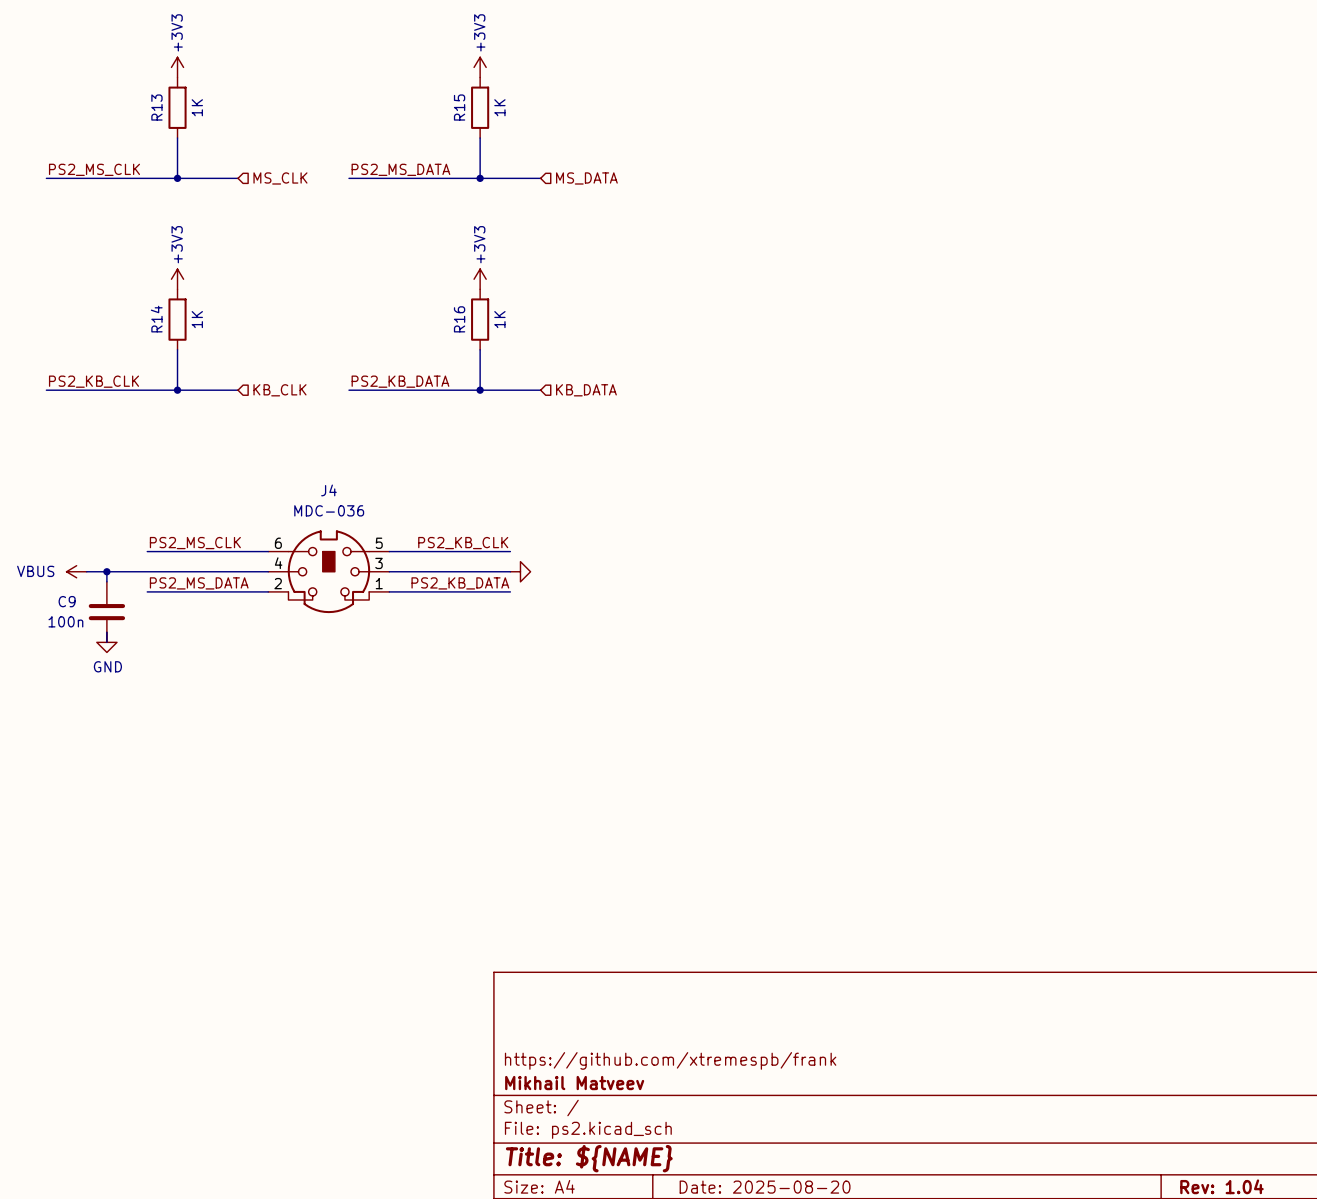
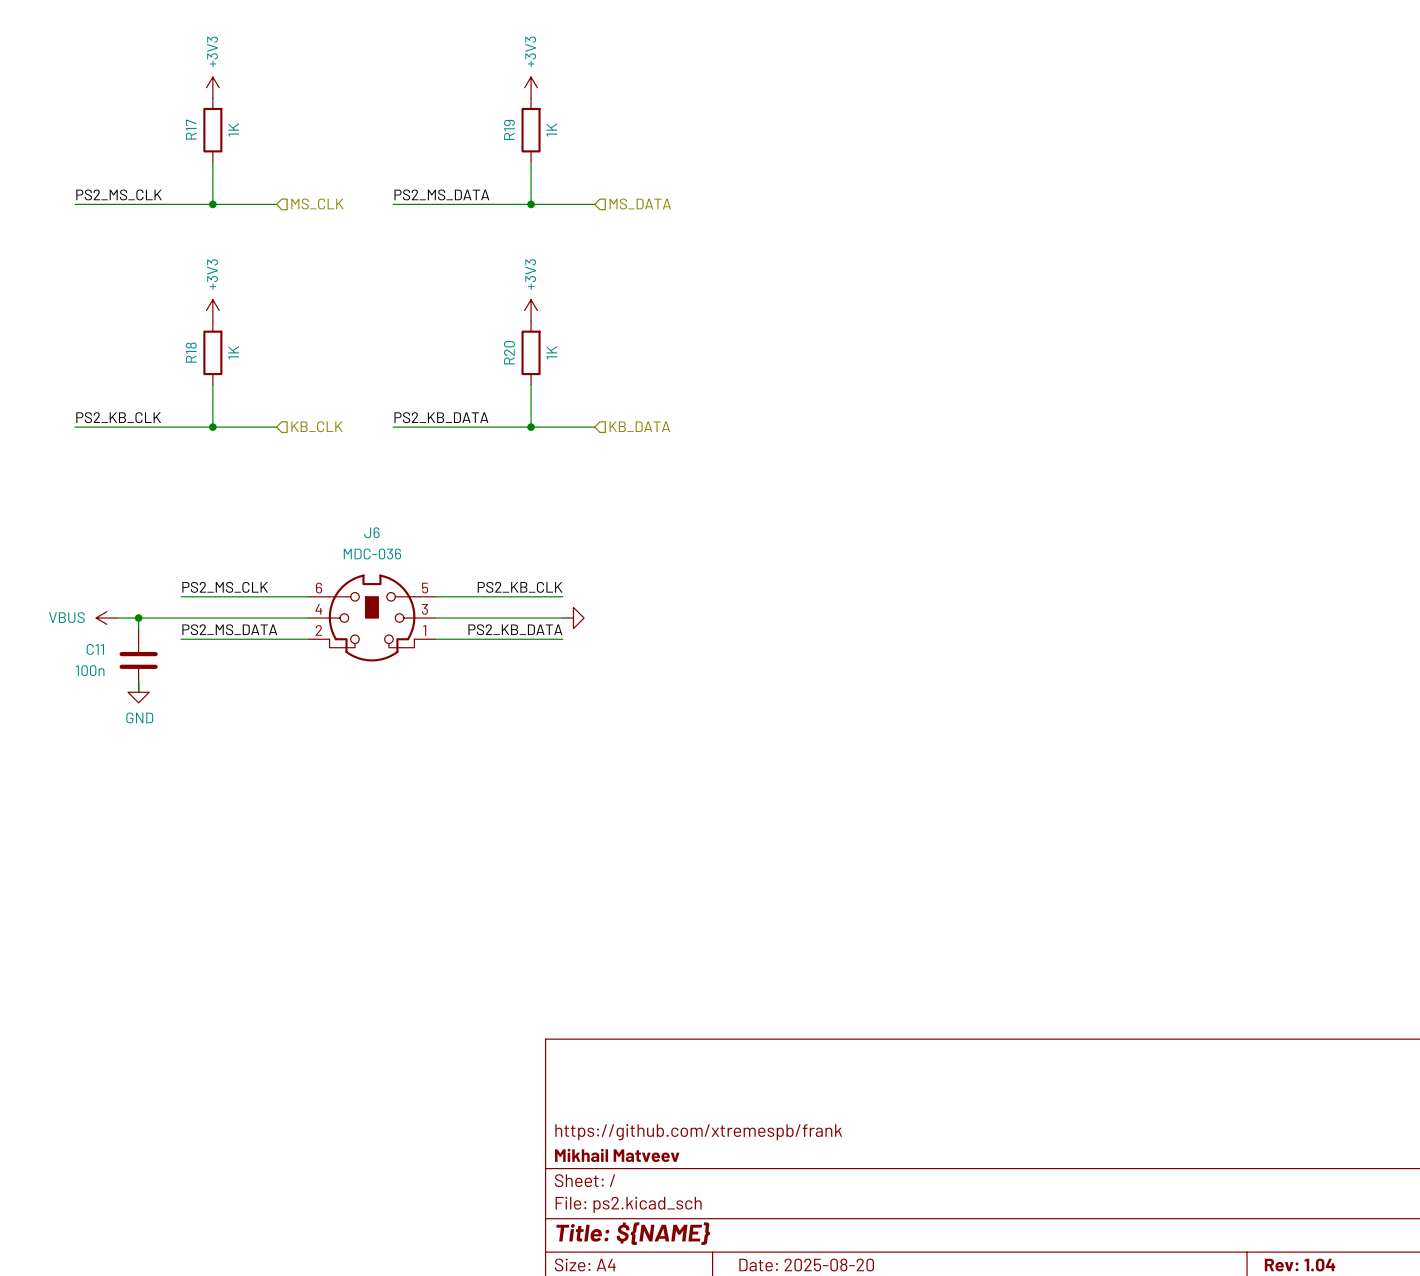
R13 name: R13 (156, 107) -> R17 (191, 129)
R15 name: R15 (459, 107) -> R19 (509, 129)
R14 name: R14 (156, 319) -> R18 (191, 352)
R16 name: R16 (459, 319) -> R20 (509, 352)
J4 name: J4 (328, 490) -> J6 (371, 532)
C9 name: C9 (67, 601) -> C11 (95, 649)

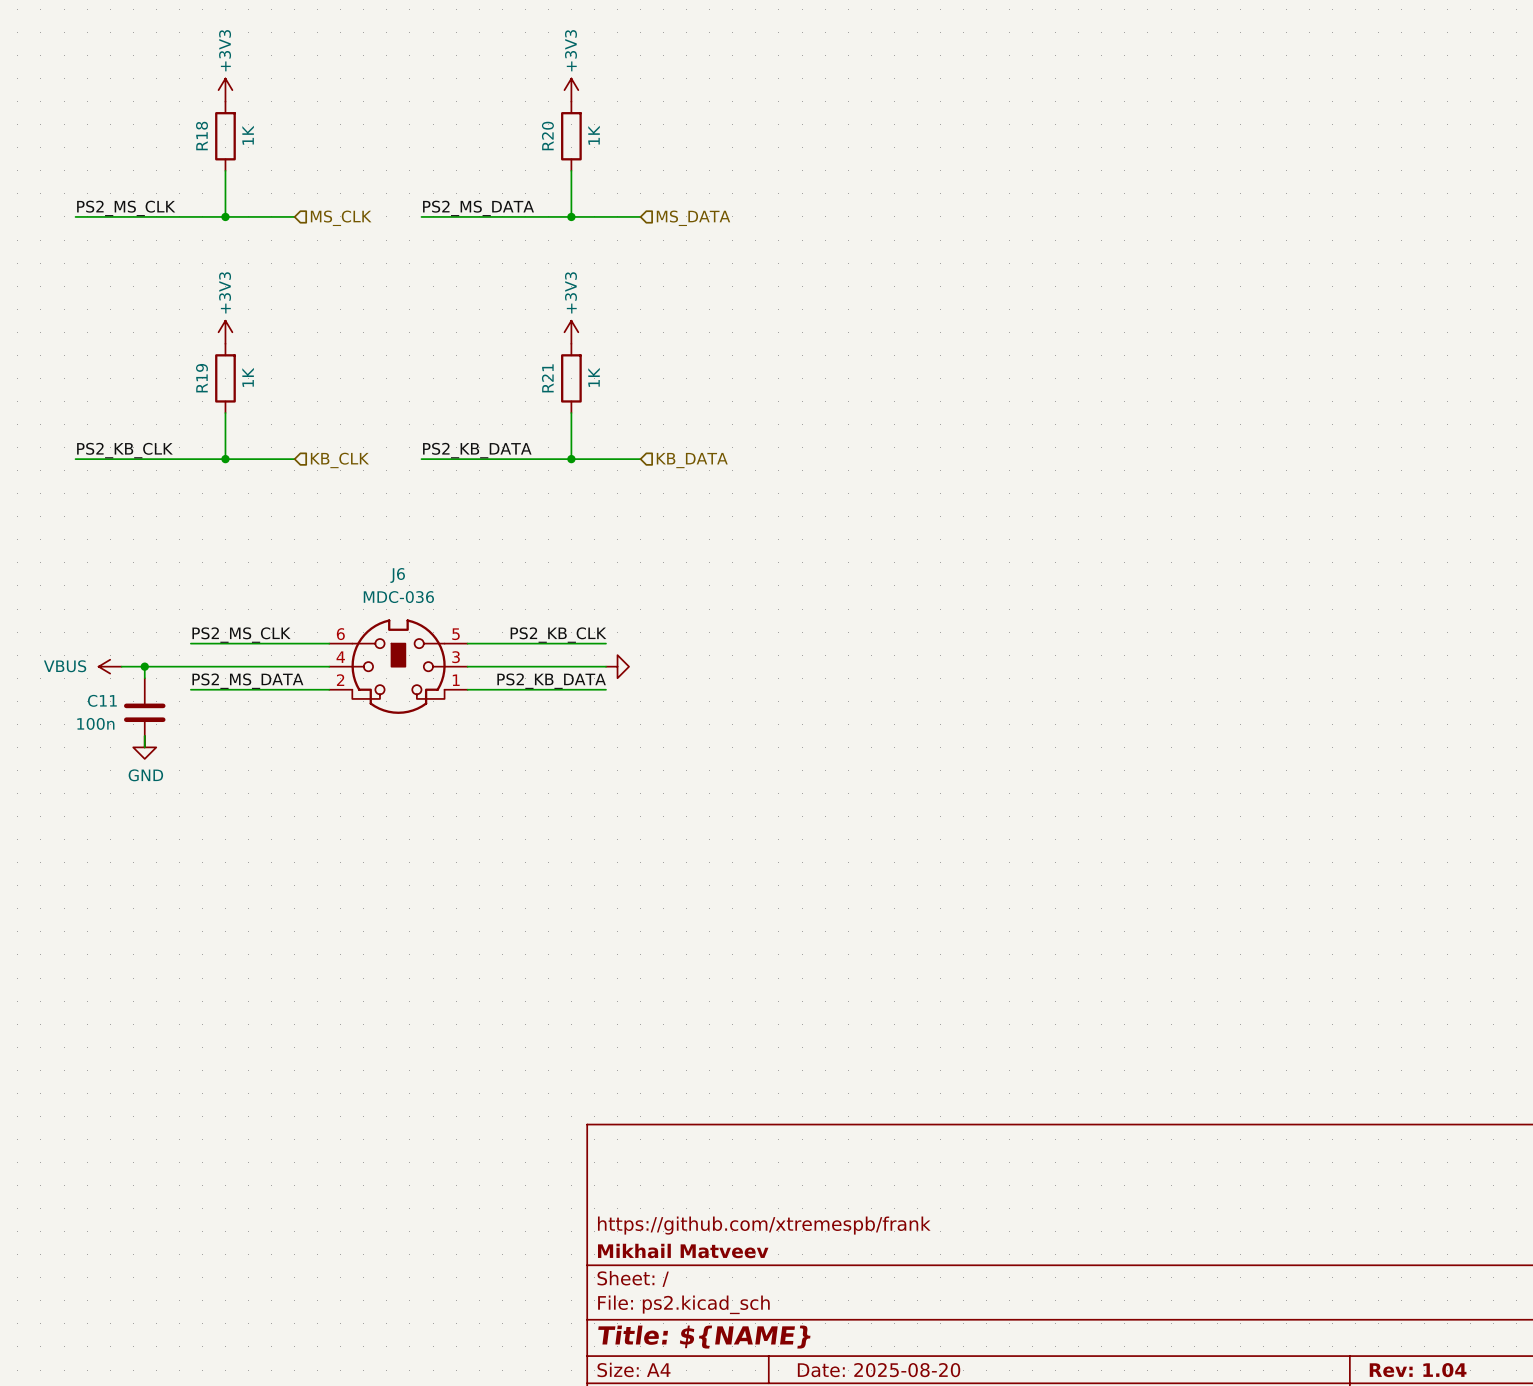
R17 name: R17 (191, 129) -> R18 (201, 136)
R19 name: R19 (509, 129) -> R20 (547, 135)
R18 name: R18 (191, 352) -> R19 (201, 378)
R20 name: R20 (509, 352) -> R21 (547, 378)

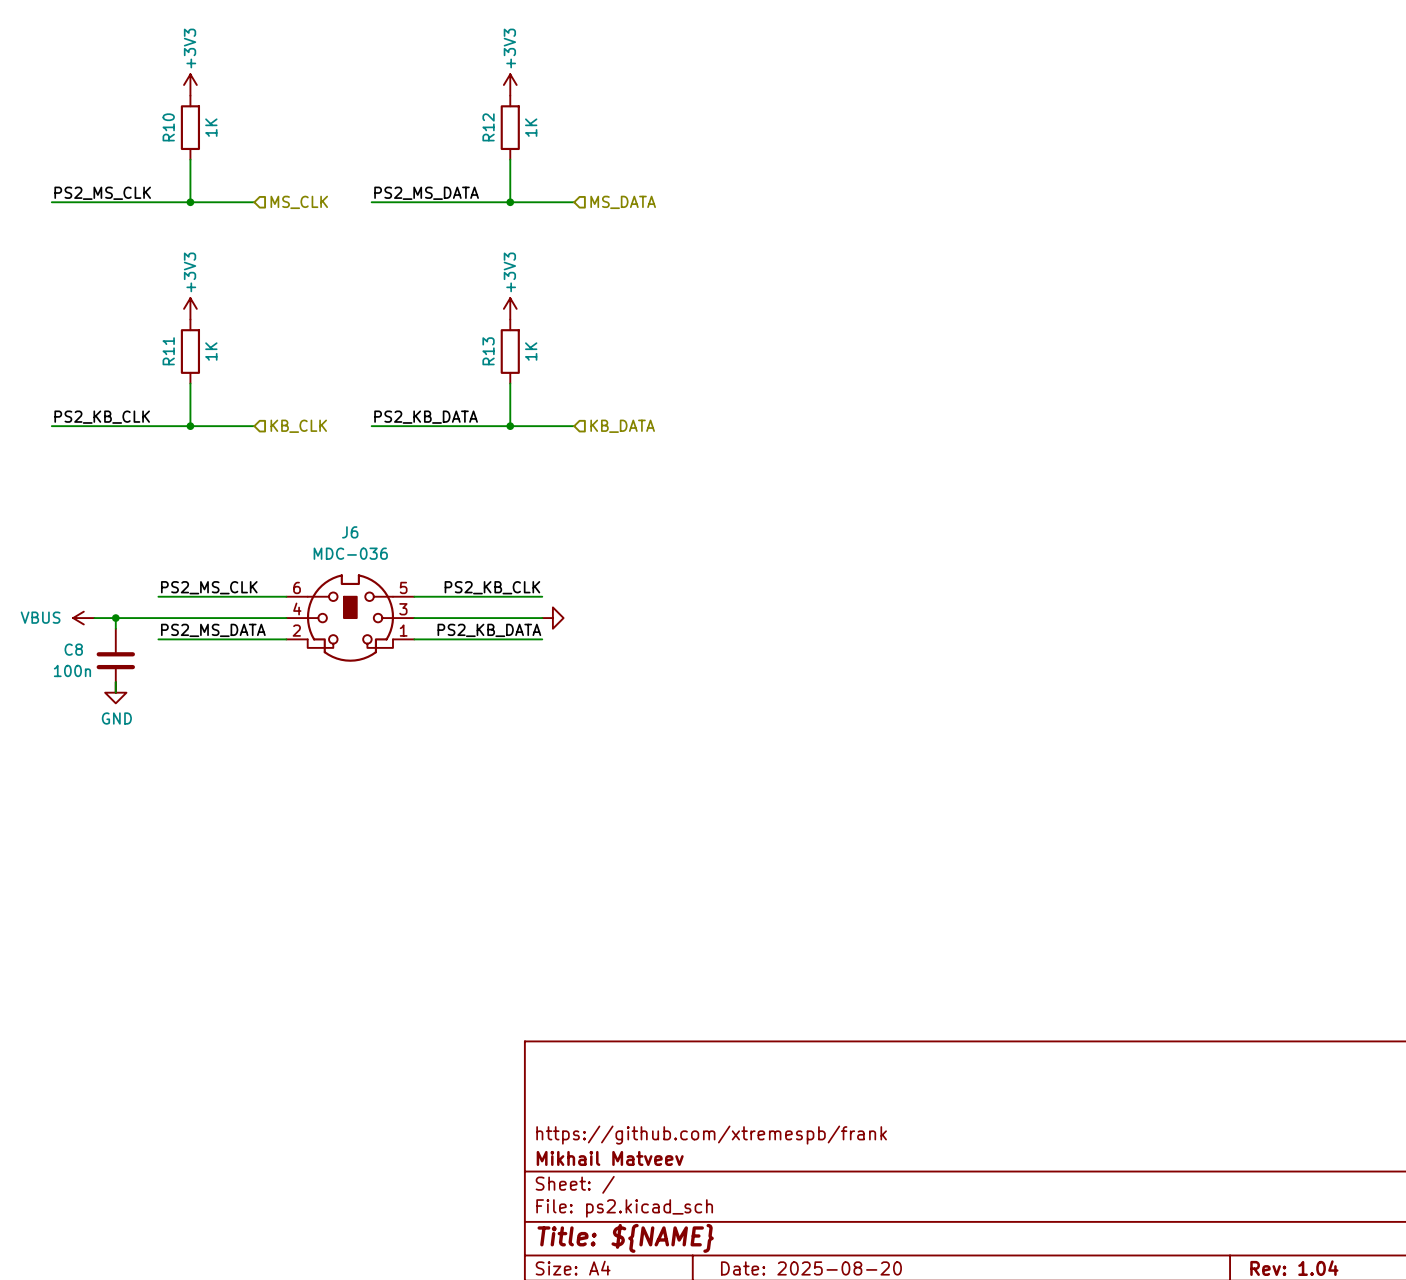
R20 name: R20 (547, 135) -> R12 (488, 127)
R18 name: R18 (201, 136) -> R10 (168, 127)
R19 name: R19 (201, 378) -> R11 (168, 351)
R21 name: R21 (547, 378) -> R13 (488, 351)
C11 name: C11 (102, 700) -> C8 (73, 649)

